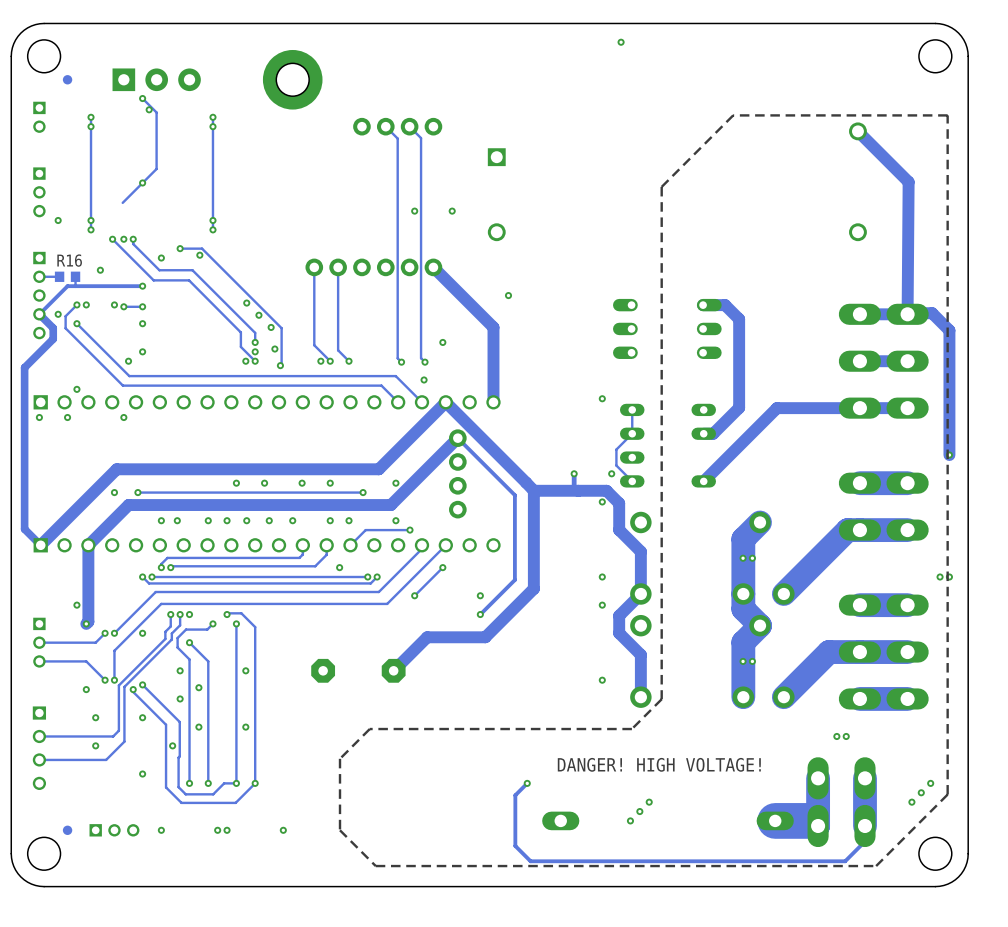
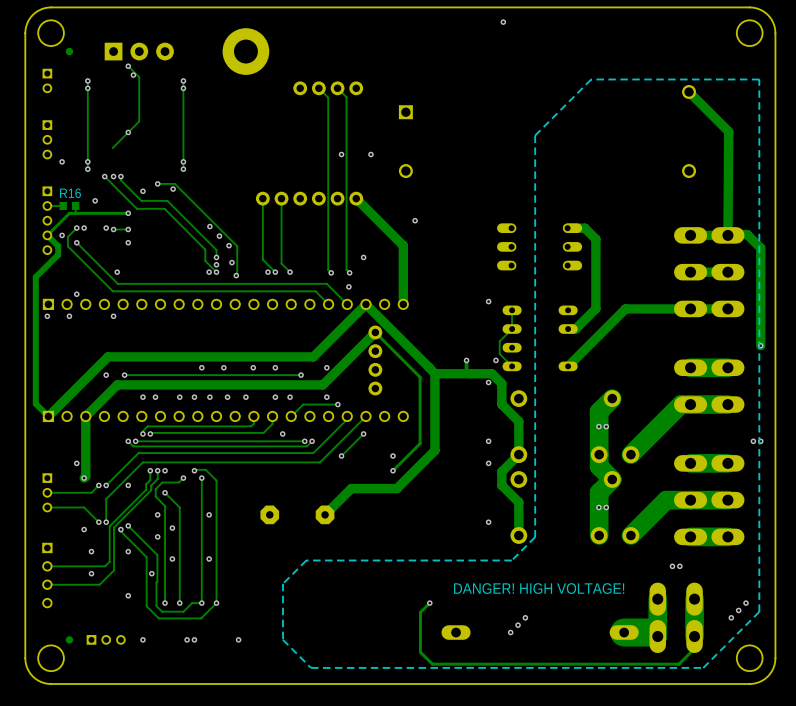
via: (142, 351) -> none

